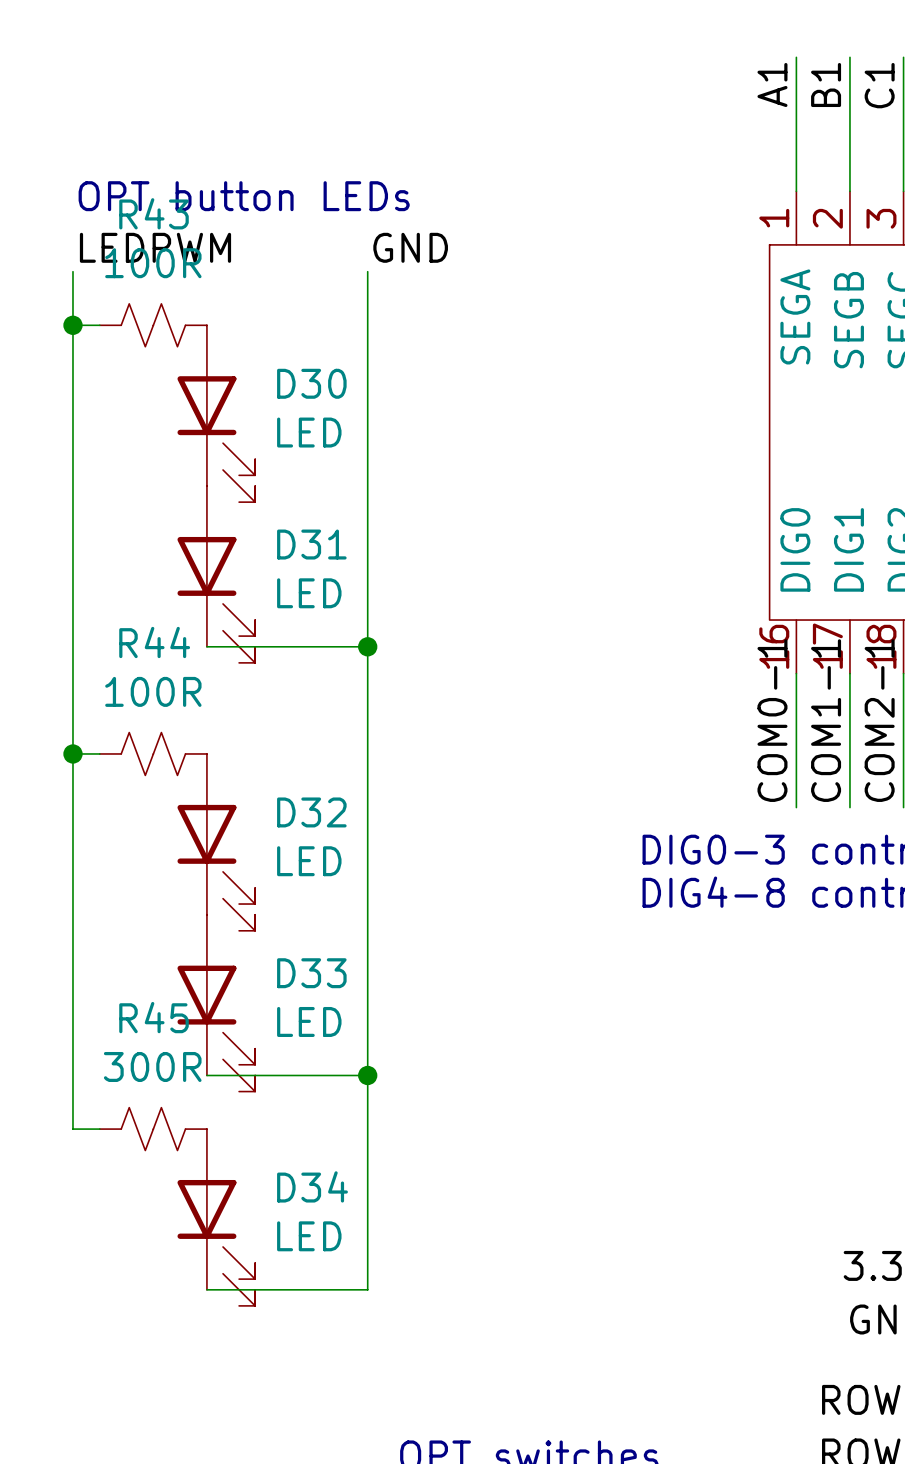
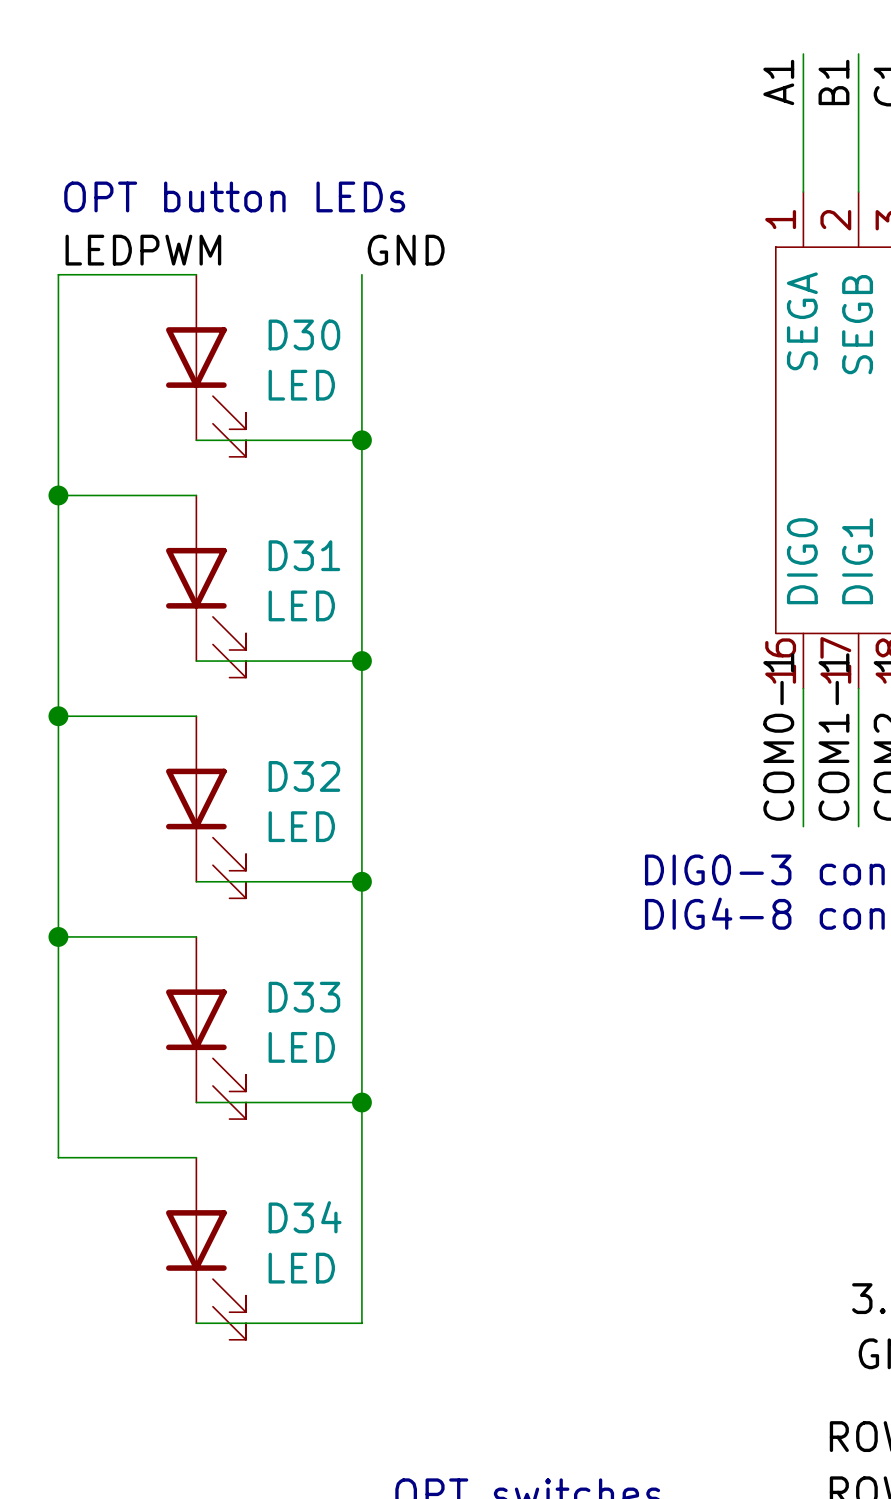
wire: none -> (58, 274) (196, 274)
wire: (72, 325) (99, 325) -> none
junction: (72, 325) -> none
R43: 100R (153, 325) -> none
D30 position: (216, 413) -> (206, 365)
wire: none -> (196, 440) (361, 440)
junction: none -> (361, 440)
wire: none -> (58, 495) (196, 495)
junction: none -> (58, 495)
wire: none -> (58, 716) (196, 716)
wire: (72, 753) (99, 753) -> none
junction position: (72, 753) -> (58, 716)
R44: 100R (153, 753) -> none
D32 position: (216, 842) -> (206, 807)
wire: none -> (196, 881) (361, 881)
junction: none -> (361, 881)
wire: none -> (58, 936) (196, 936)
junction: none -> (58, 936)
wire: none -> (86, 1157) (196, 1157)
R45: 300R (153, 1129) -> none

